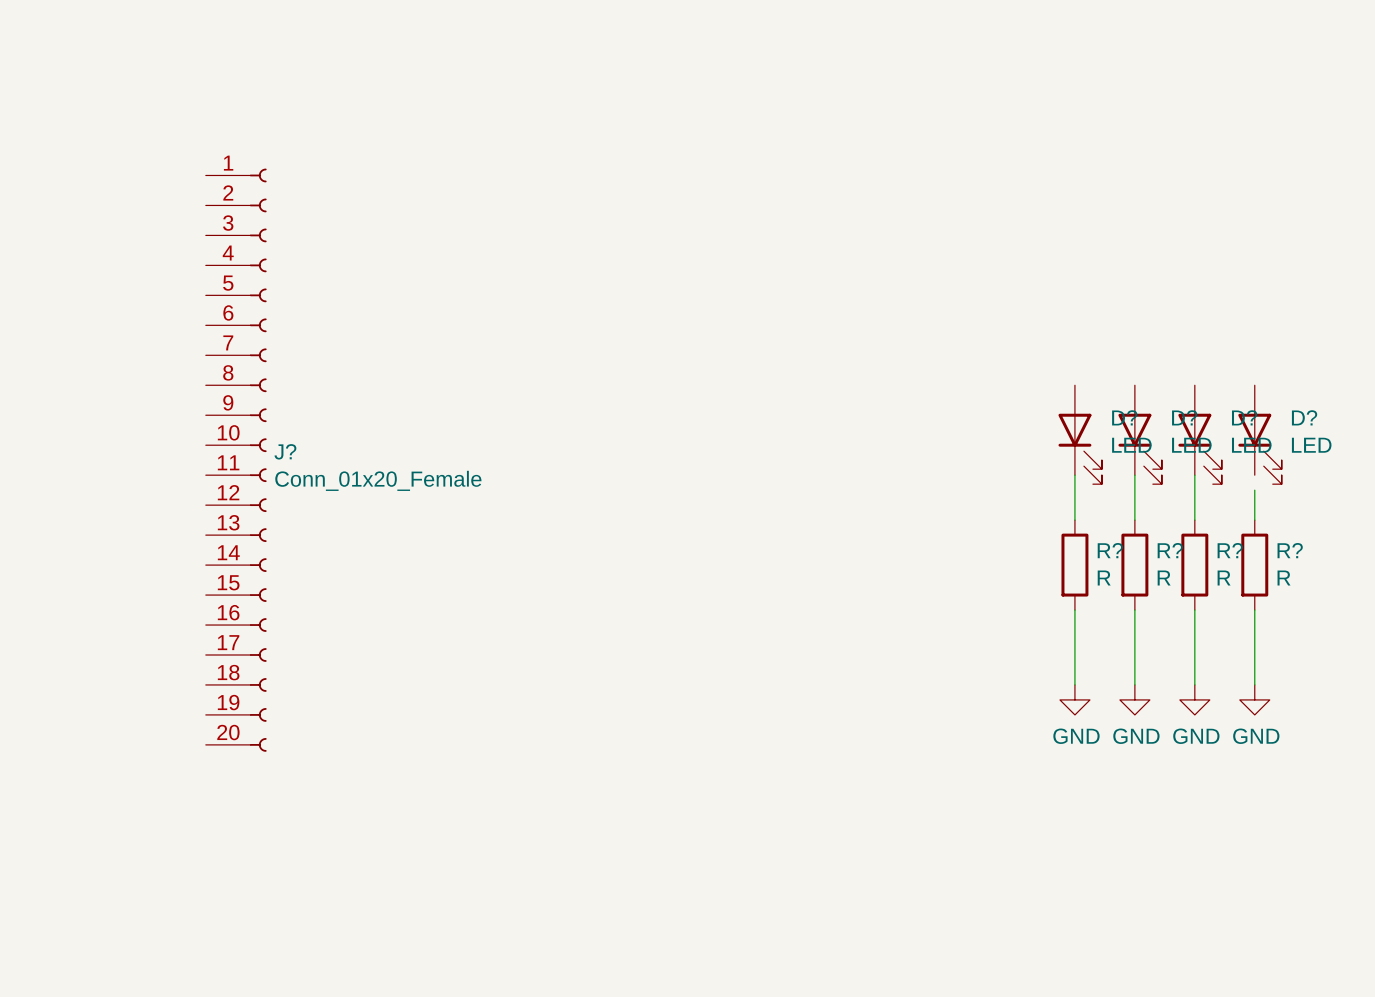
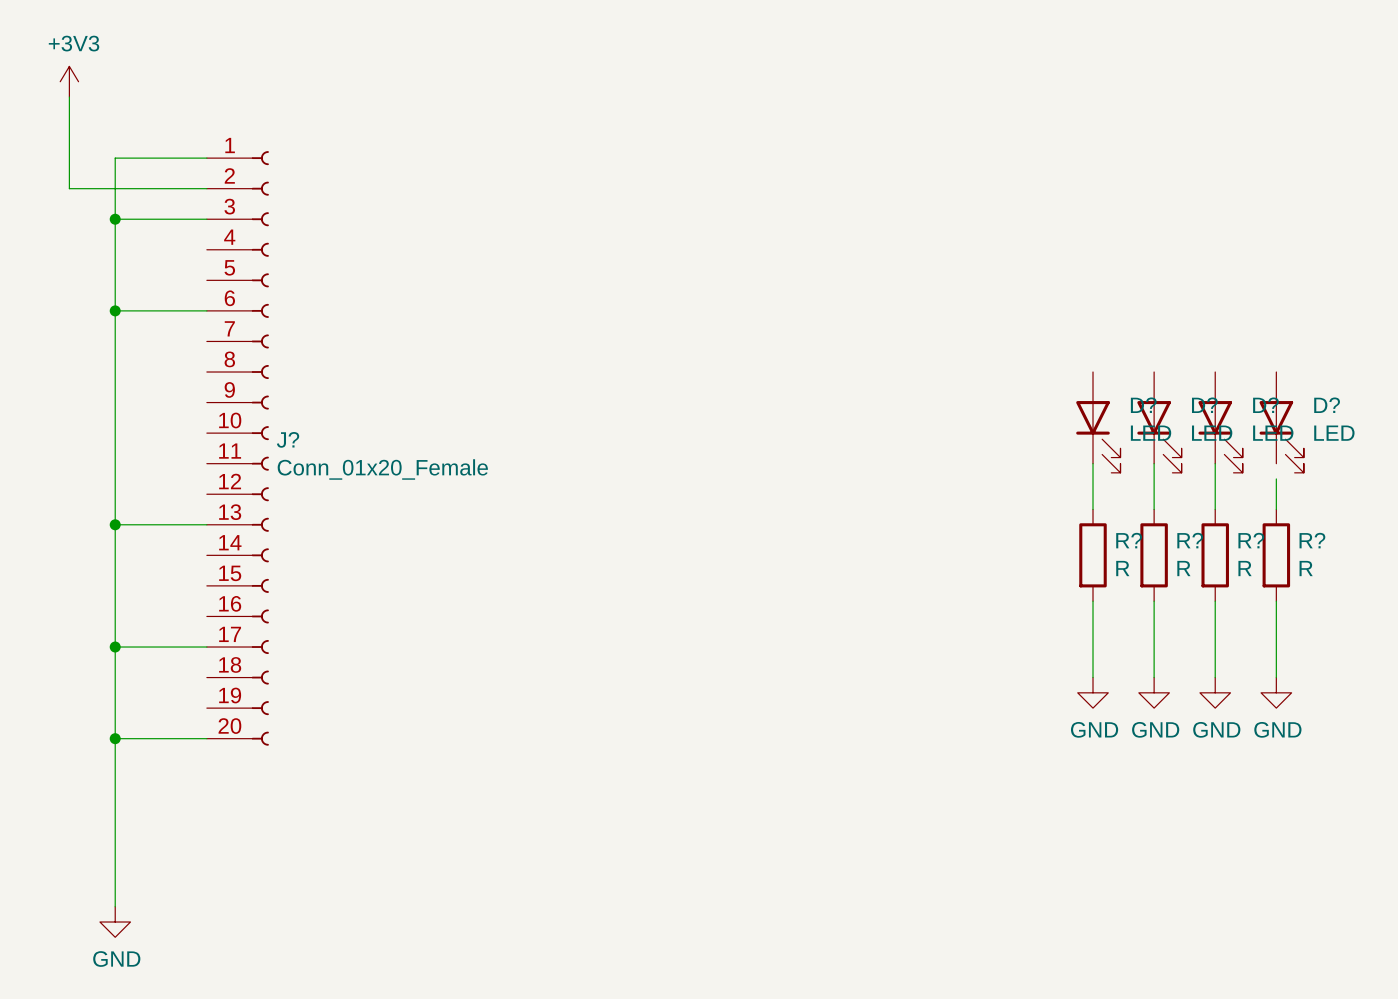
power symbol: none -> +3V3 (69, 81)
wire: none -> (69, 97) (69, 188) (206, 188)
wire: none -> (206, 158) (115, 158) (115, 906)
wire: none -> (115, 219) (206, 219)
junction: none -> (115, 219)
wire: none -> (115, 310) (206, 310)
junction: none -> (115, 310)
wire: none -> (115, 524) (206, 524)
junction: none -> (115, 524)
wire: none -> (115, 647) (206, 647)
junction: none -> (115, 647)
wire: none -> (115, 738) (206, 738)
junction: none -> (115, 738)
power symbol: none -> GND (115, 922)

